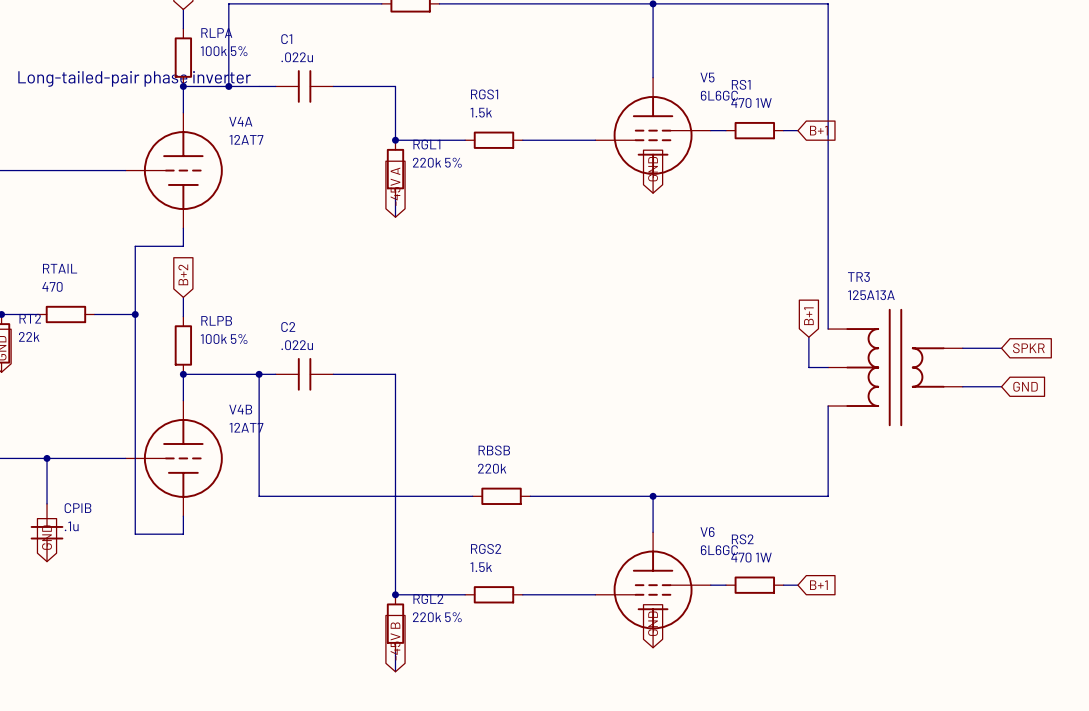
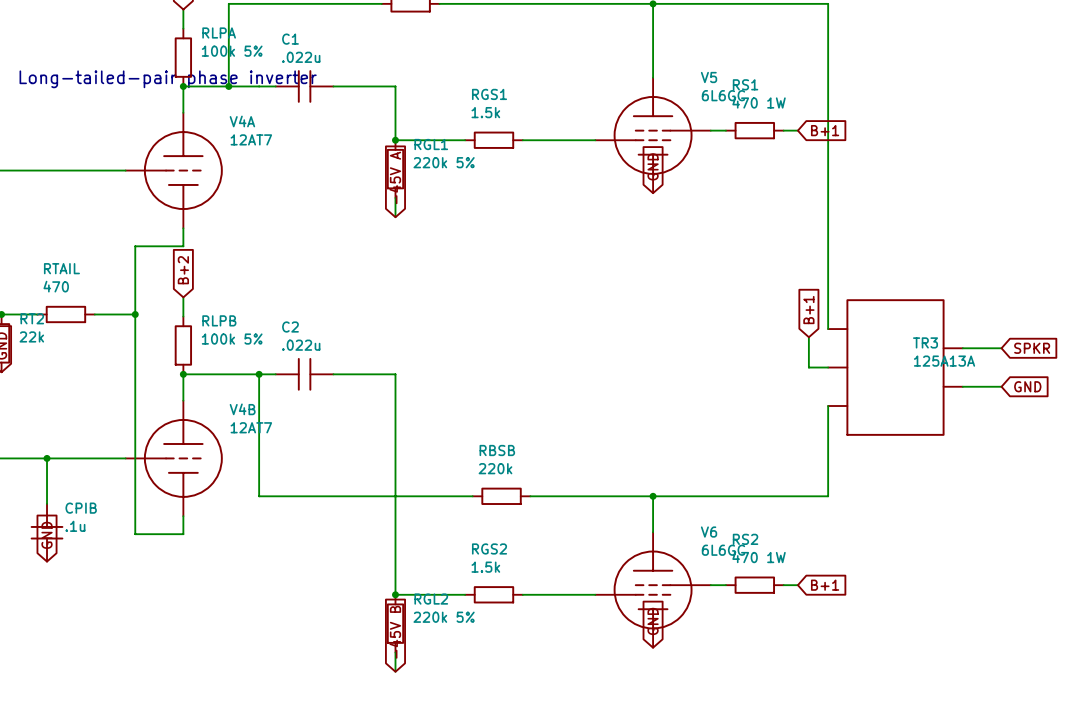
TR3 name position: TR3 (858, 277) -> TR3 (925, 342)
TR3 value position: 125A13A (871, 295) -> 125A13A (944, 361)
TR3 symbol: [828, 308, 963, 427] -> [828, 299, 963, 436]

